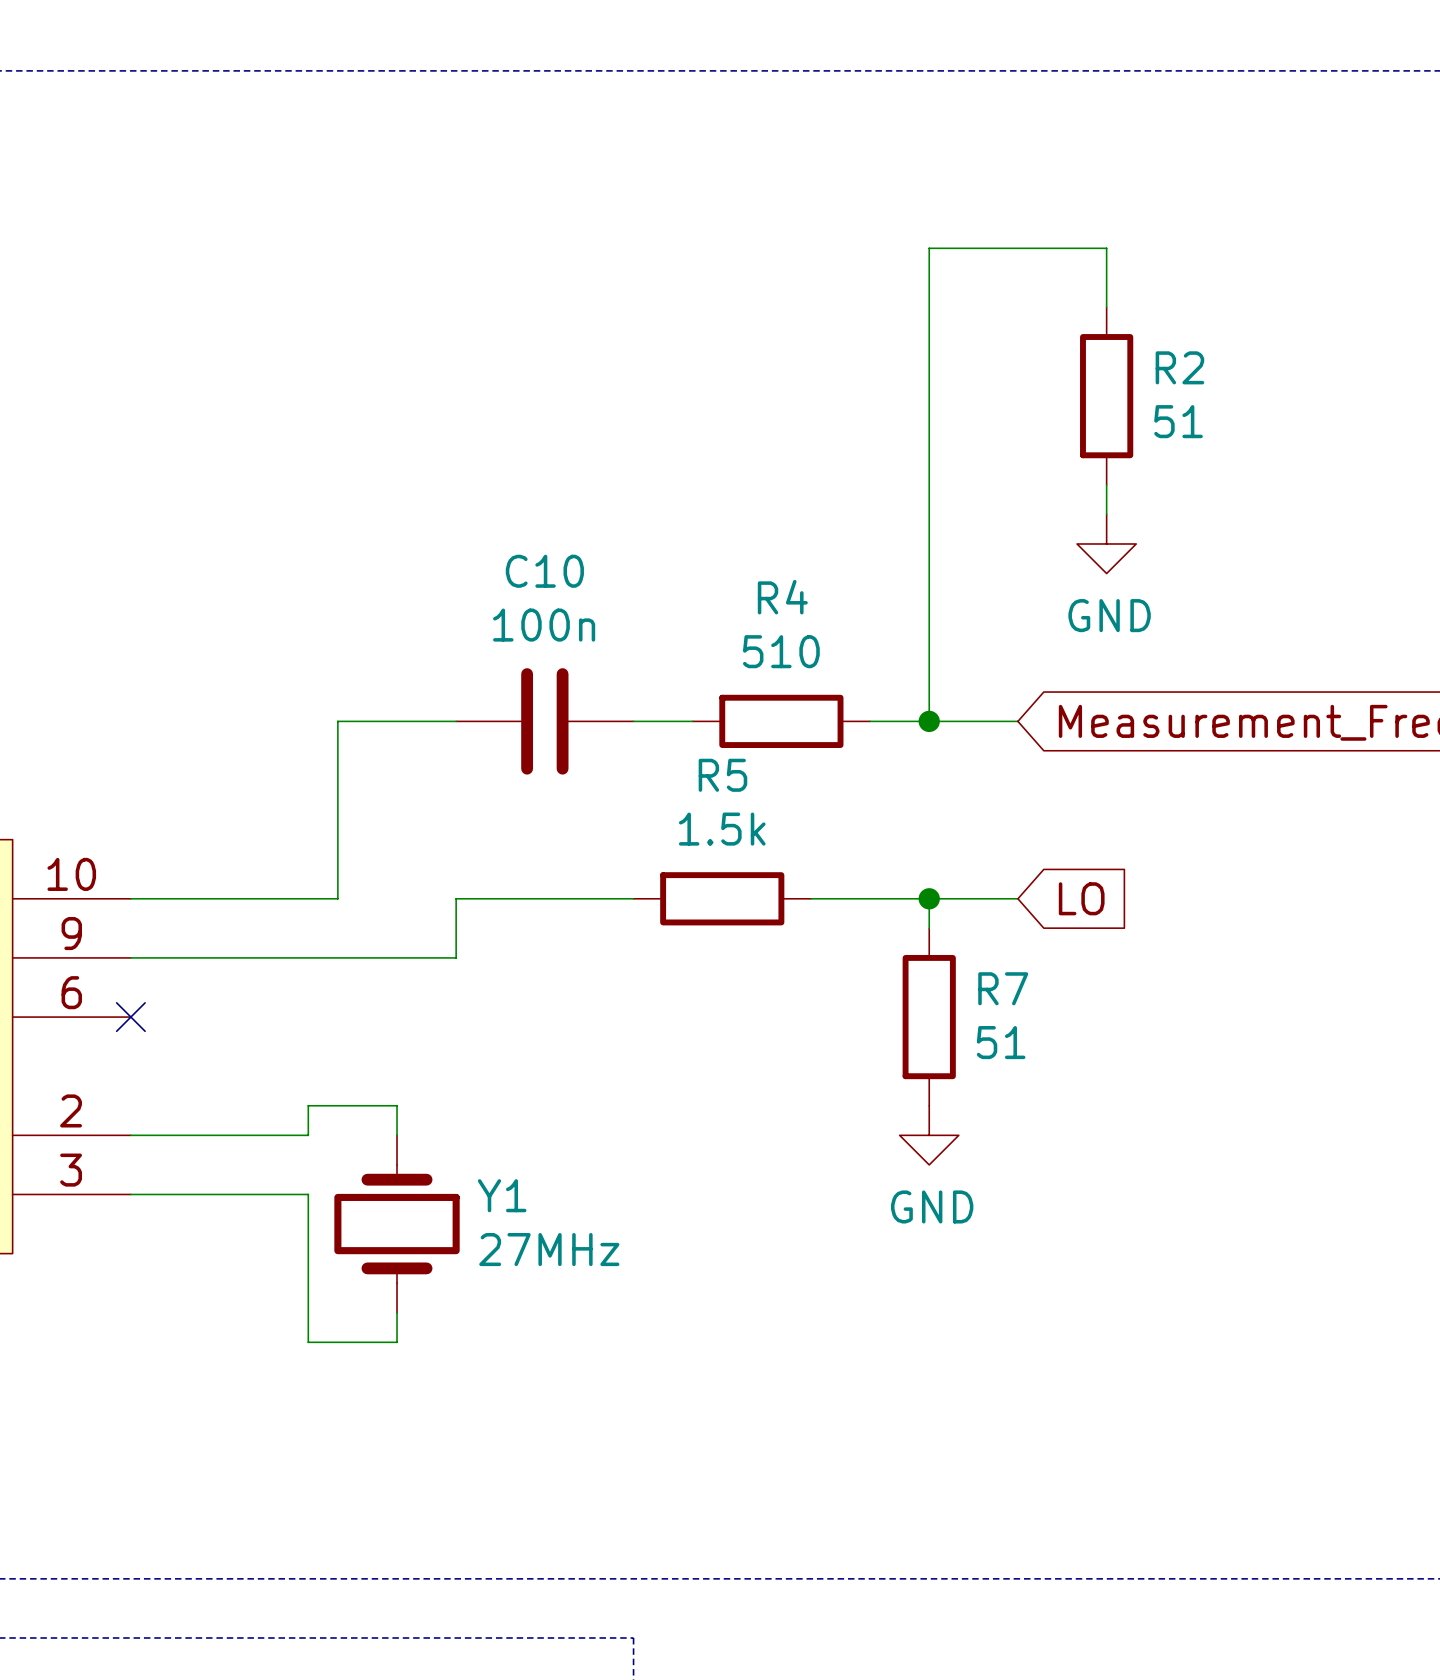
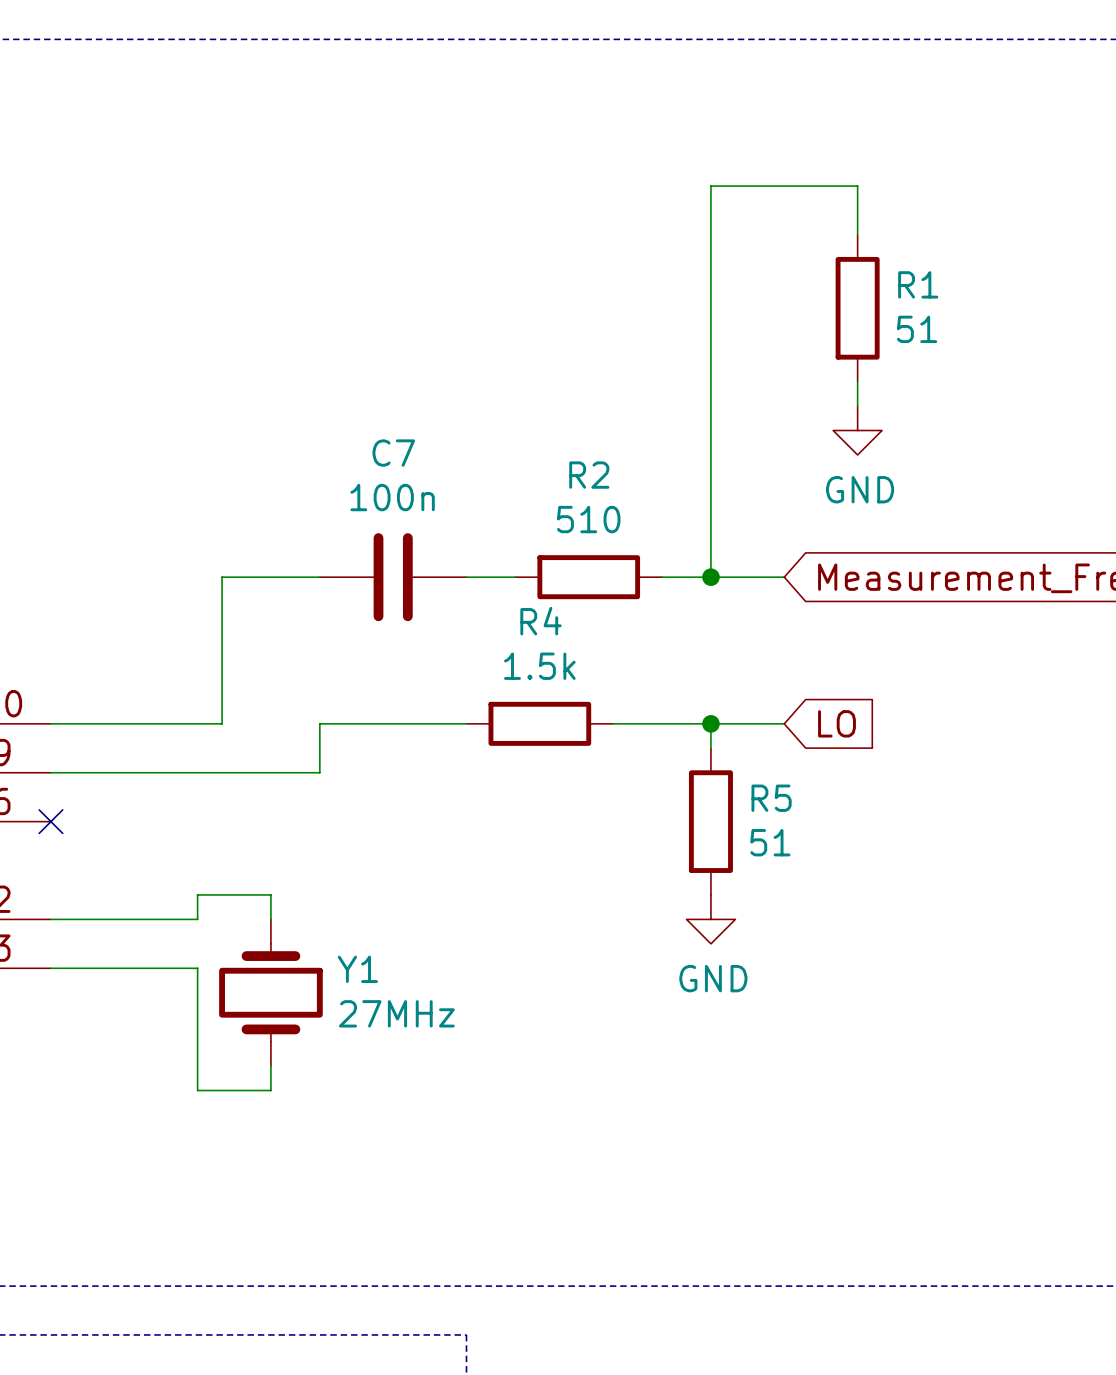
R2 name: R2 (1179, 367) -> R1 (918, 284)
C10 name: C10 (544, 571) -> C7 (393, 453)
R4 name: R4 (782, 597) -> R2 (589, 475)
R5 name: R5 (722, 775) -> R4 (541, 621)
R7 name: R7 (1003, 988) -> R5 (771, 798)

